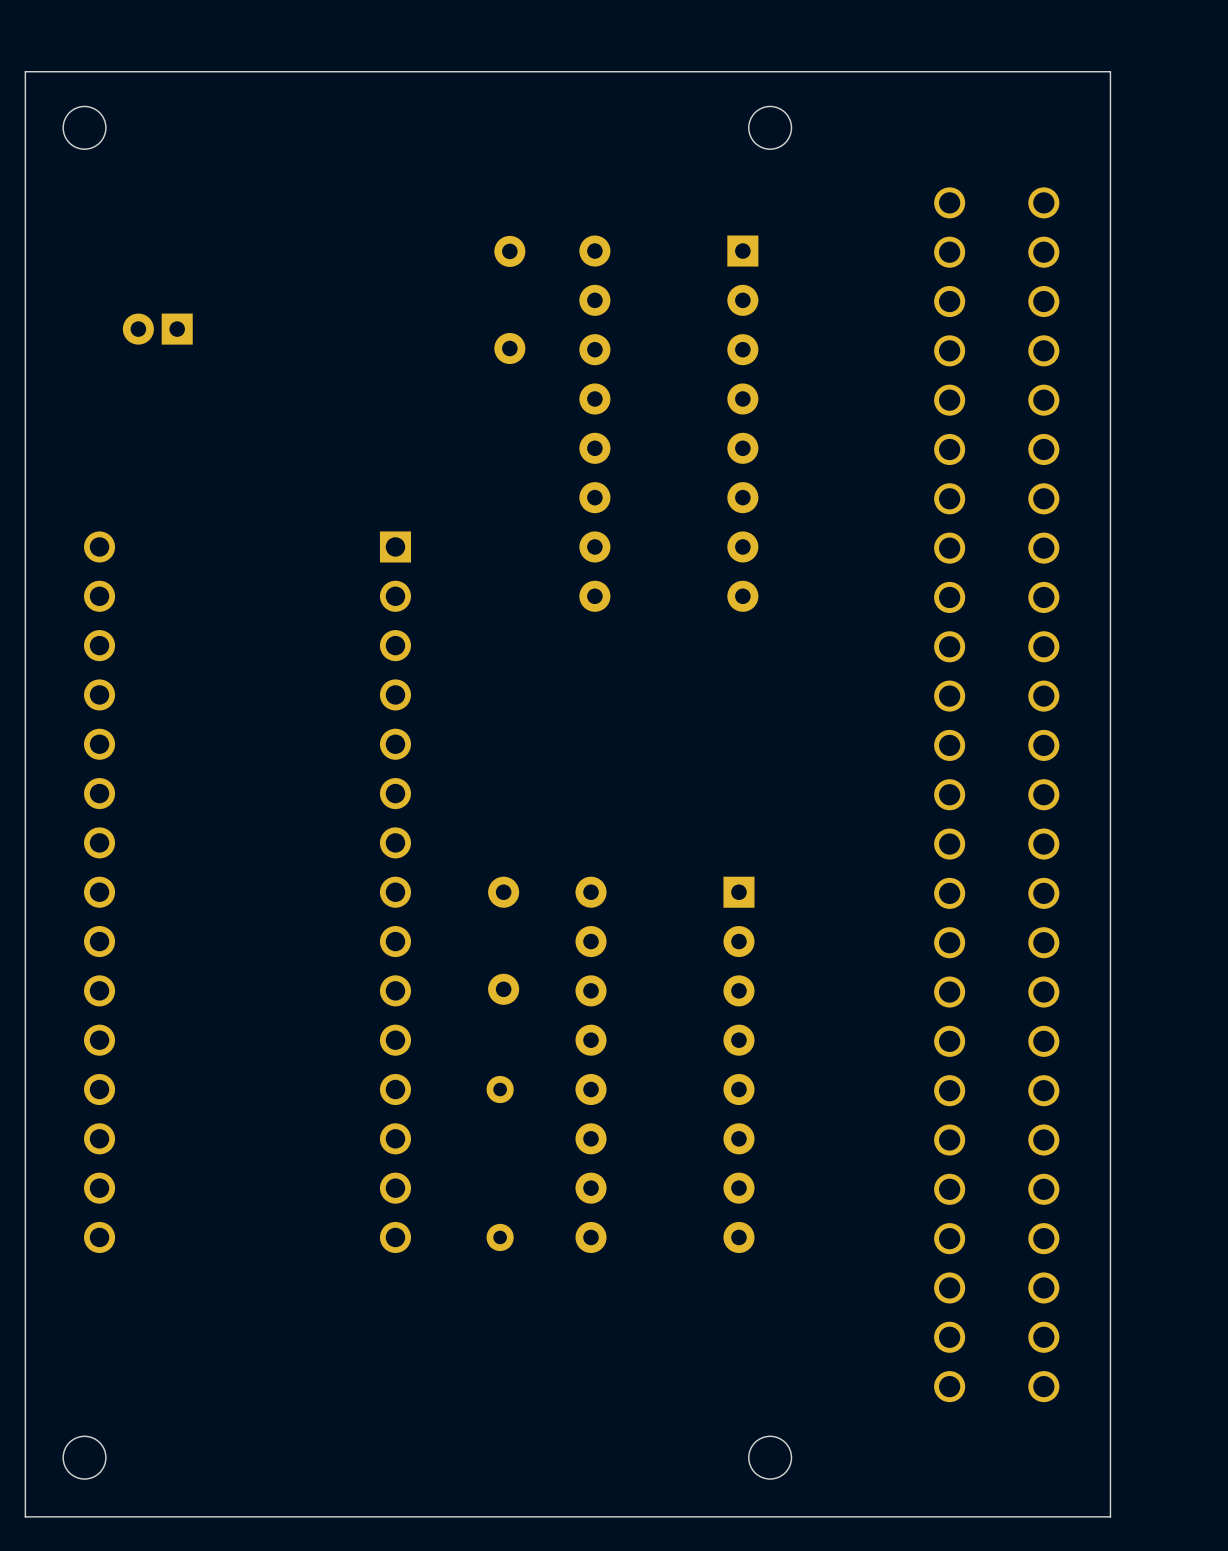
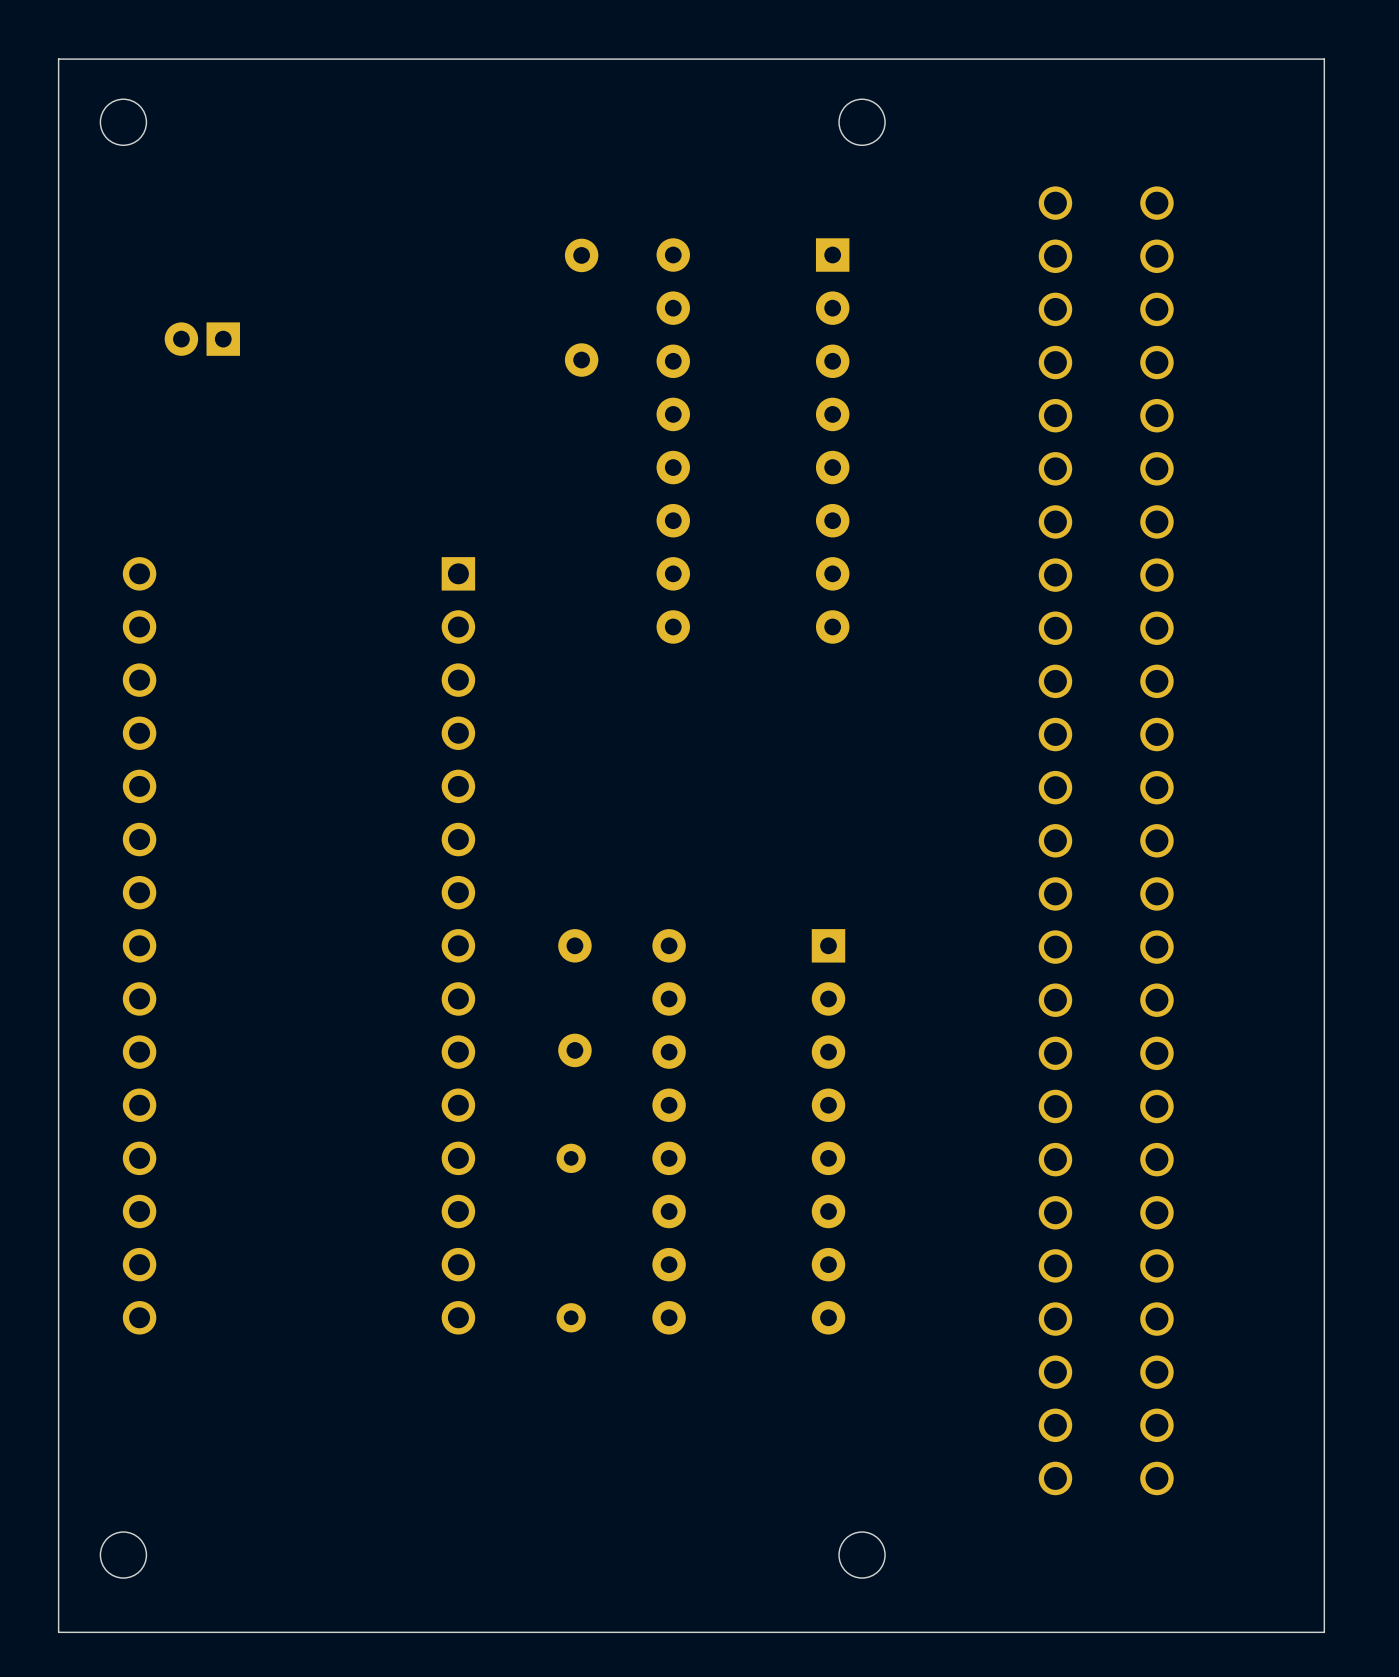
board edge: (1110, 71) (25, 71) (25, 1516) (1110, 1516) (1110, 71) -> (1324, 59) (1324, 1632) (58, 1632) (58, 59) (1324, 59)

